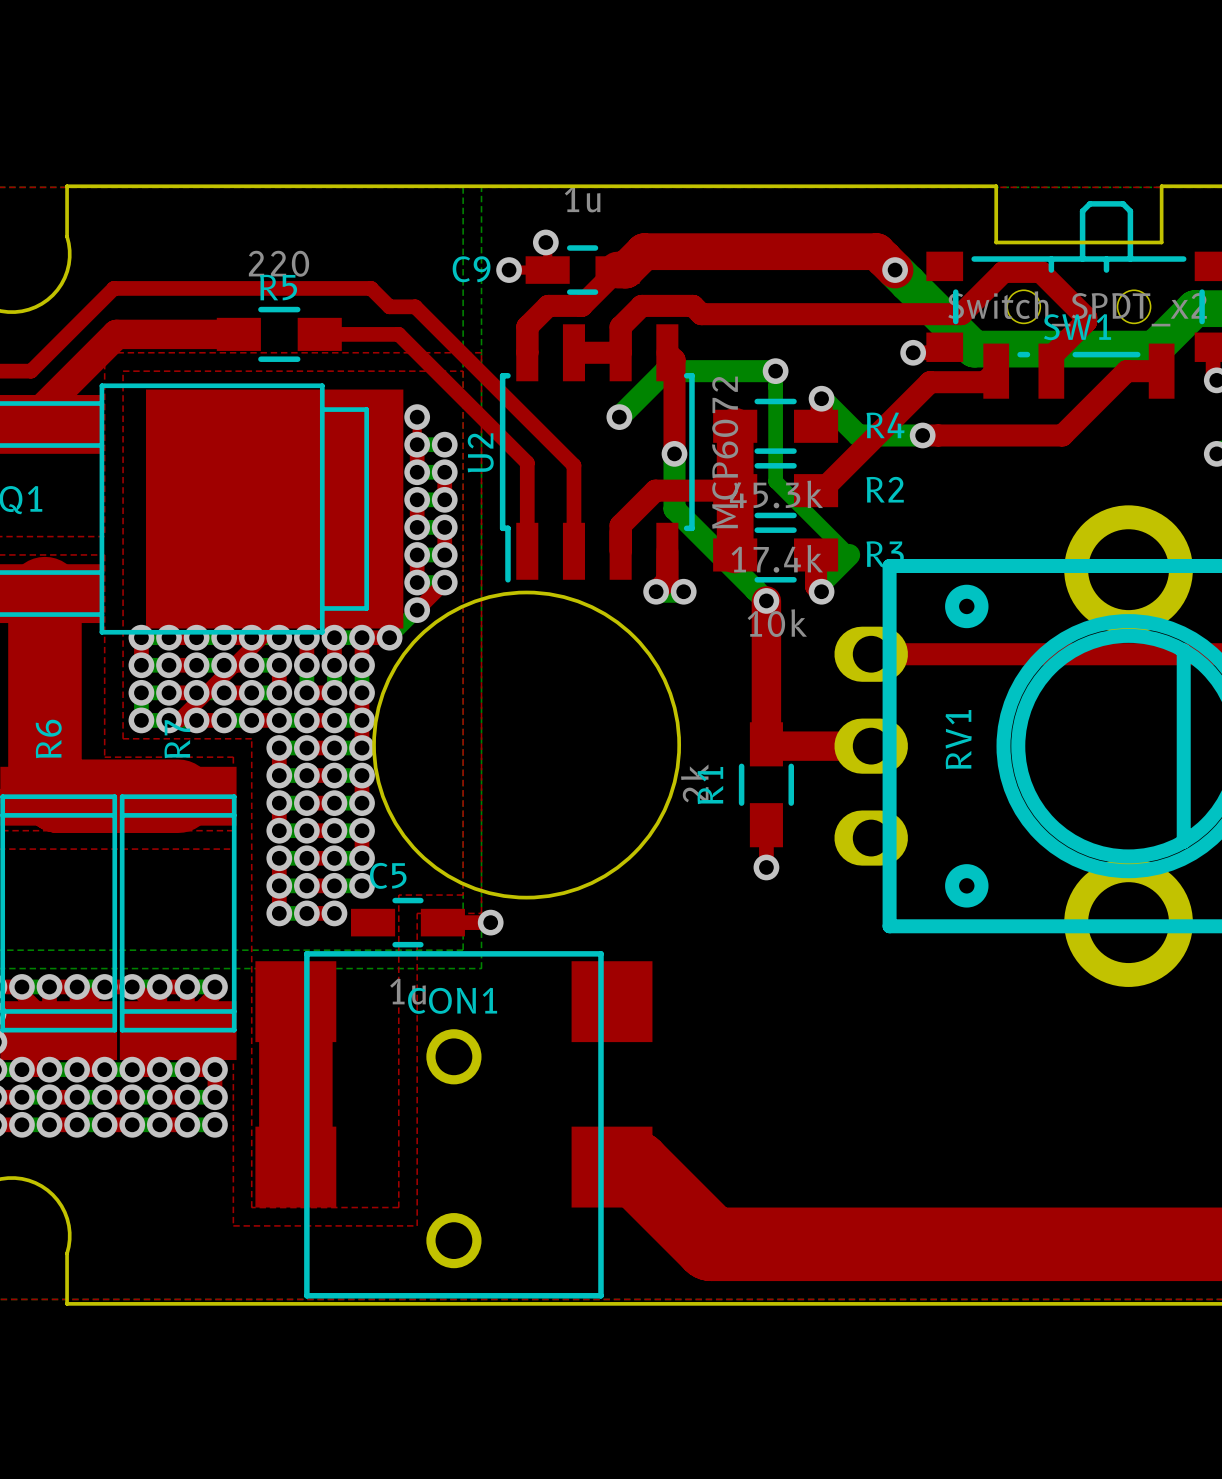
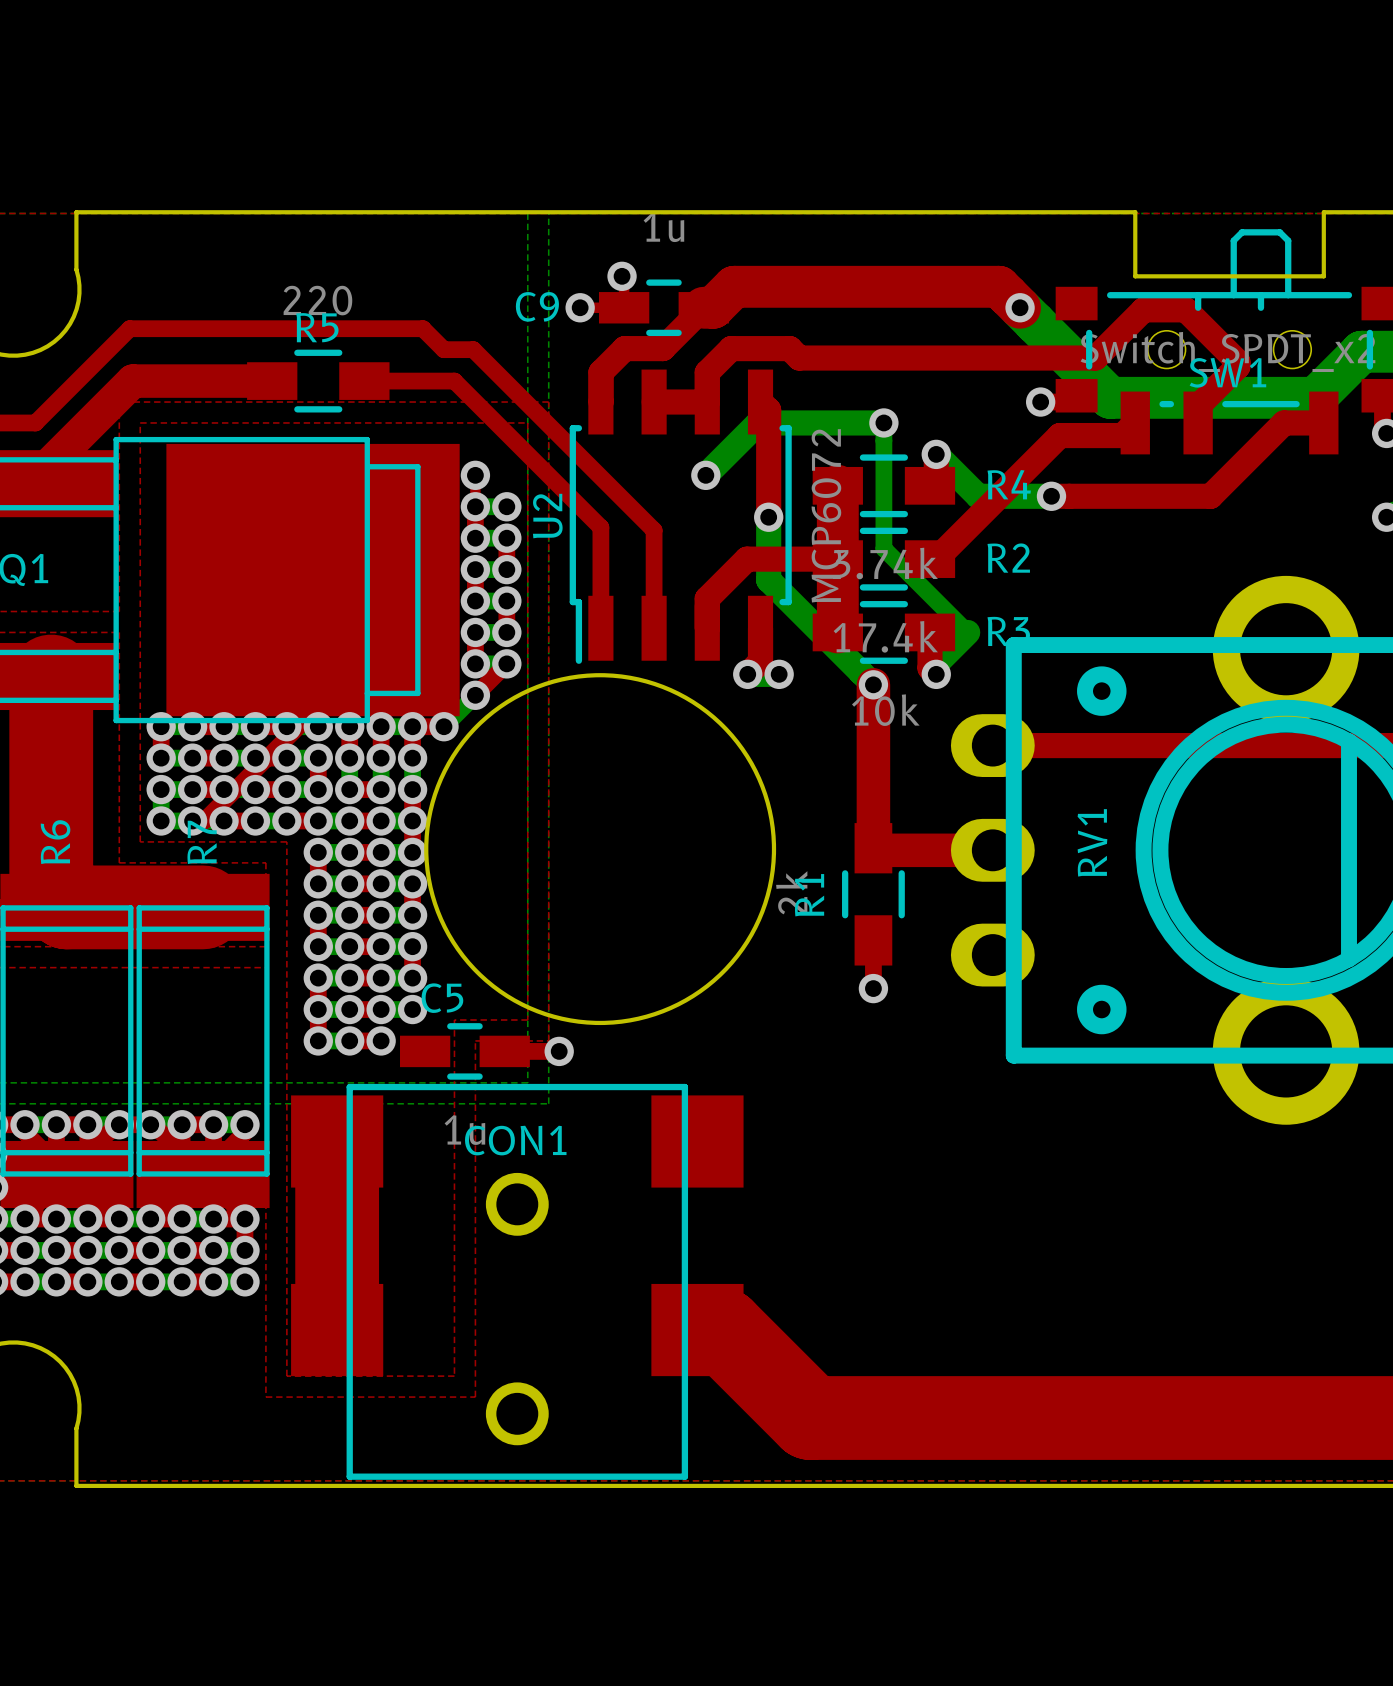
R4 value: 45.3k (776, 494) -> 3.74k (885, 563)

